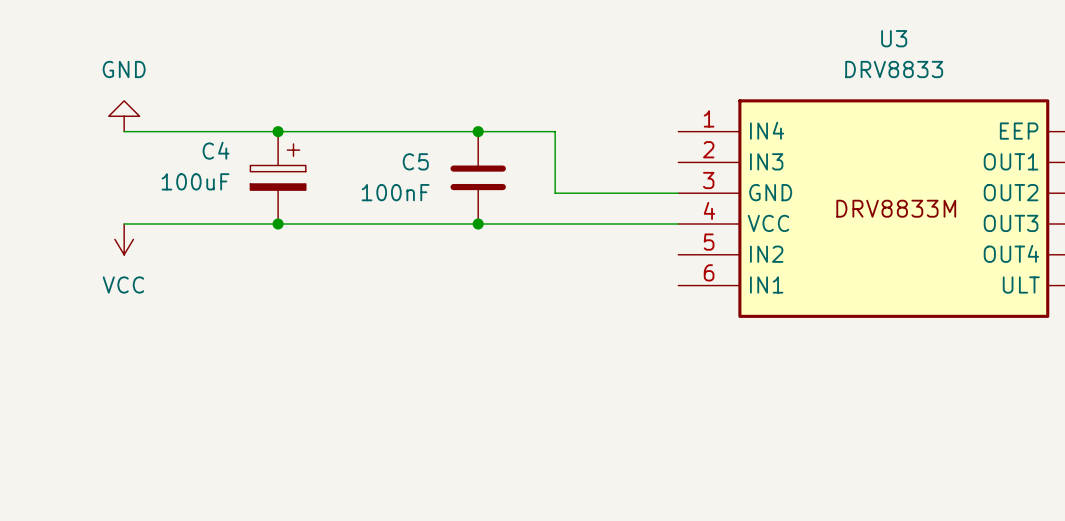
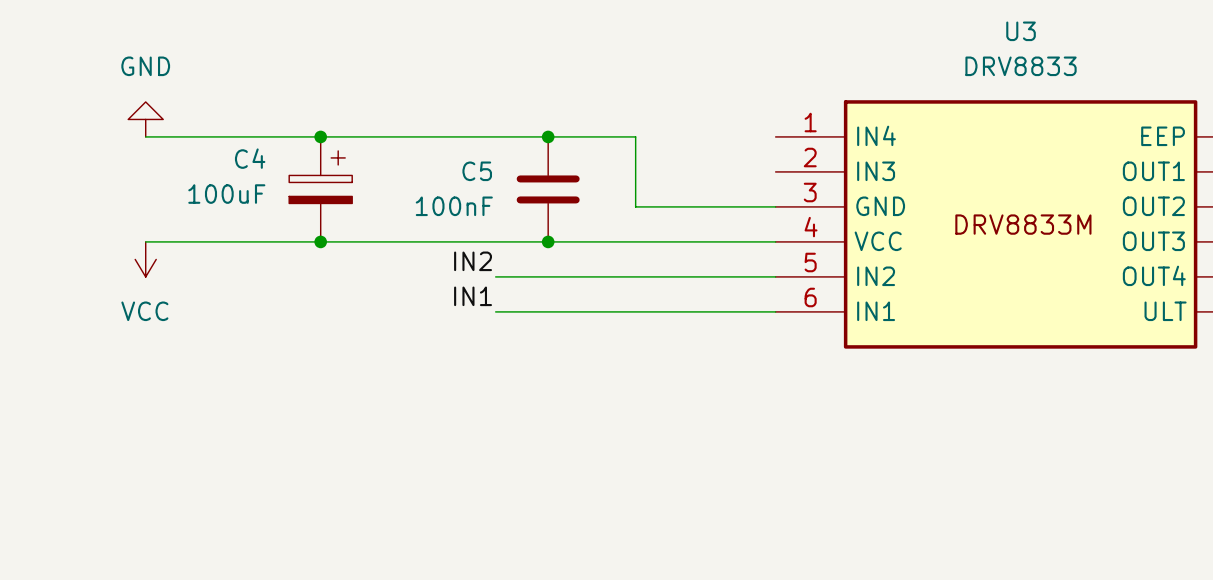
label: none -> IN2 (473, 261)
wire: none -> (495, 276) (775, 276)
label: none -> IN1 (473, 296)
wire: none -> (495, 311) (775, 311)

